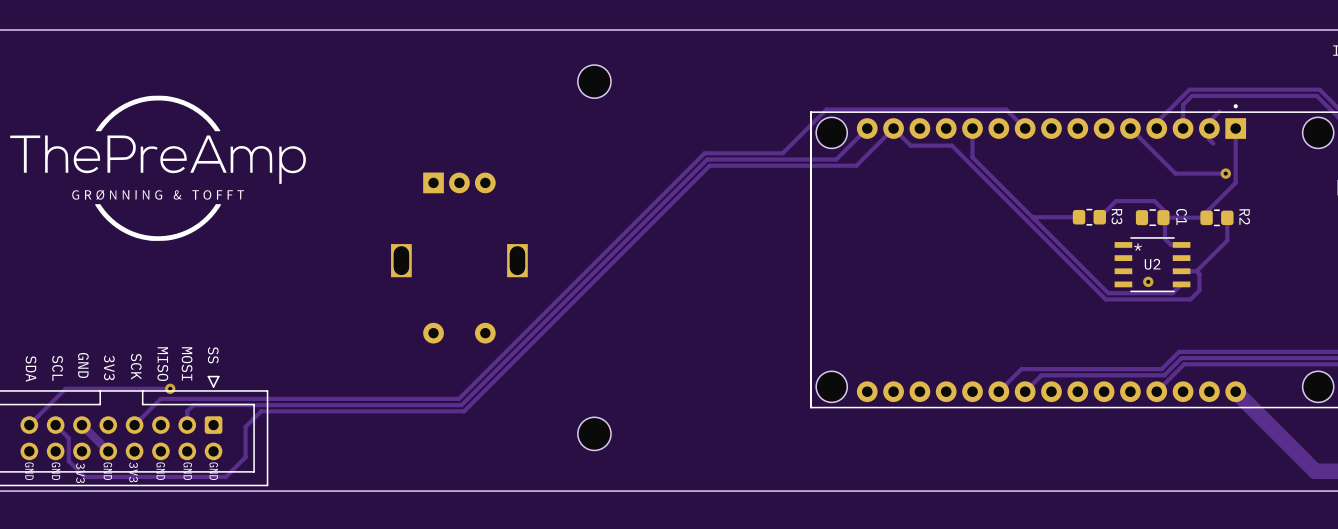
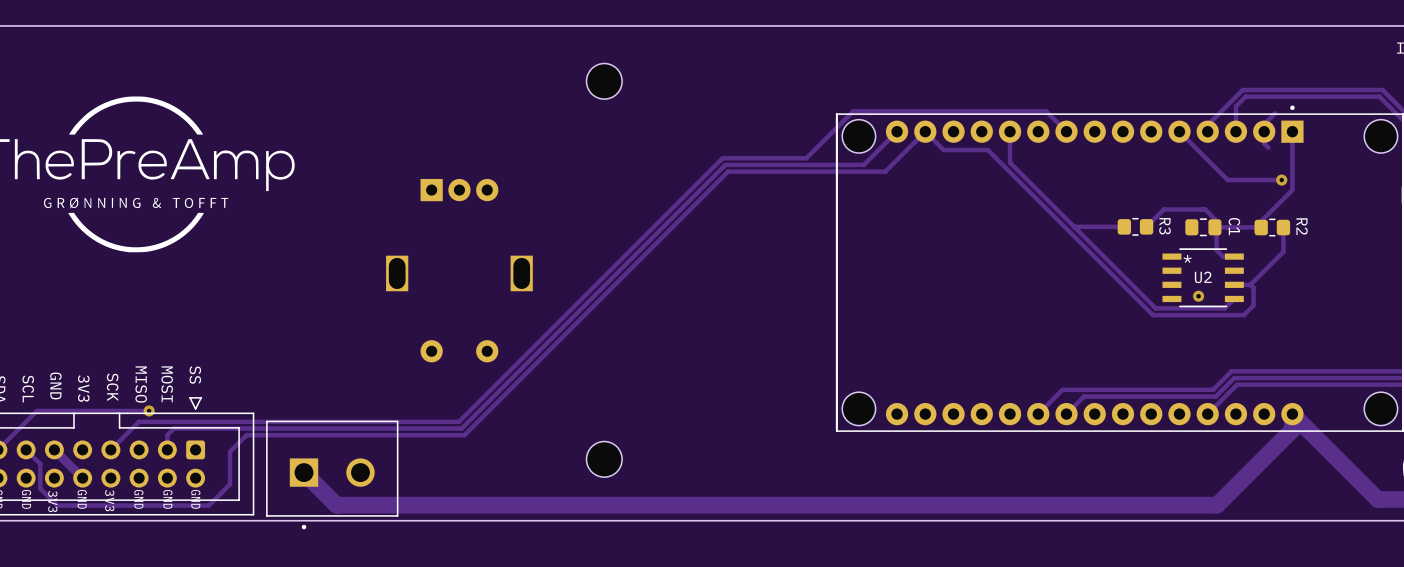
track: none -> (1292, 414) (1292, 429) (1217, 505) (336, 505) (304, 472)
part: none -> (332, 475)

